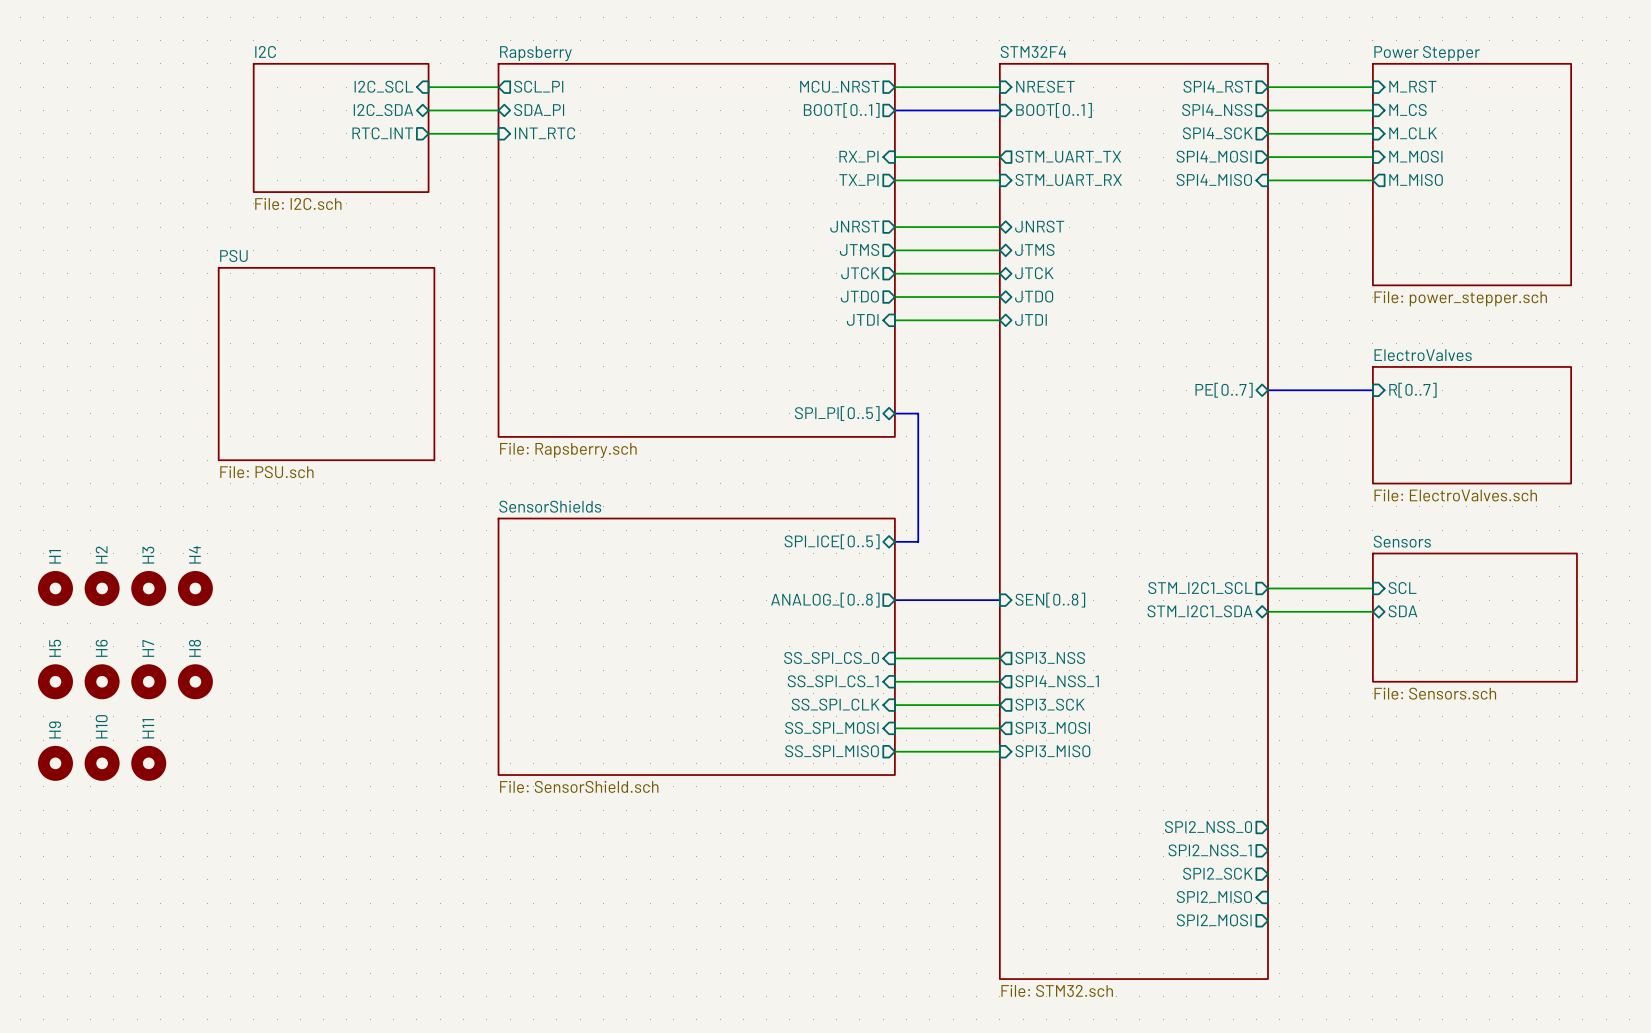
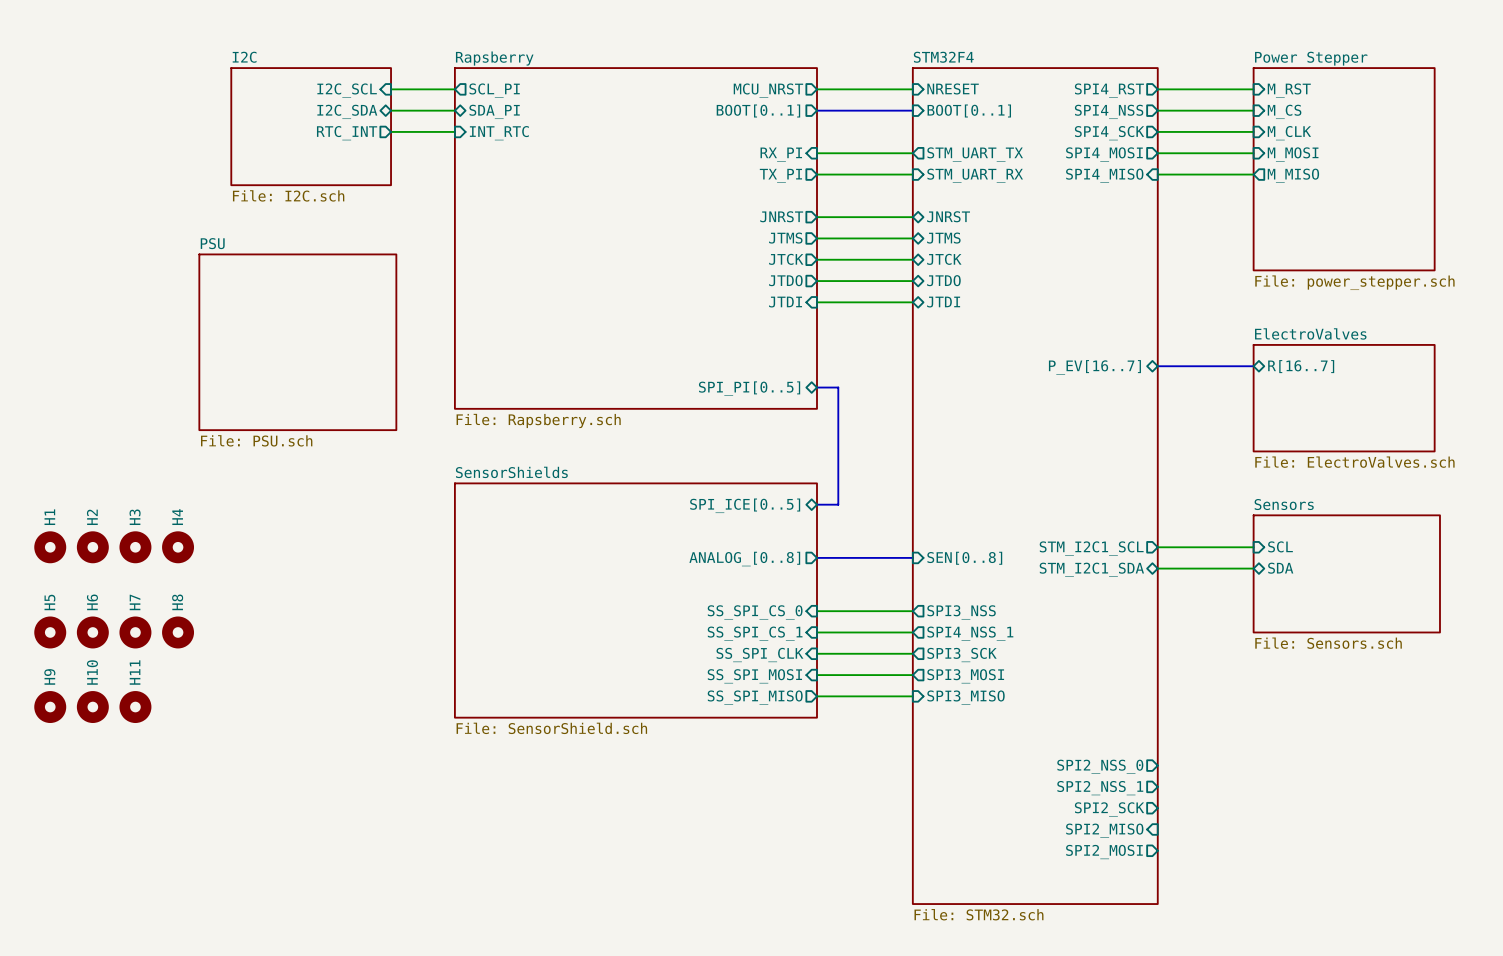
sheet pin: PE[0..7] (1224, 390) -> P_EV[16..7] (1094, 367)
sheet pin shape: input (1412, 390) -> bidirectional (1301, 366)
sheet pin: R[0..7] (1412, 390) -> R[16..7] (1301, 366)

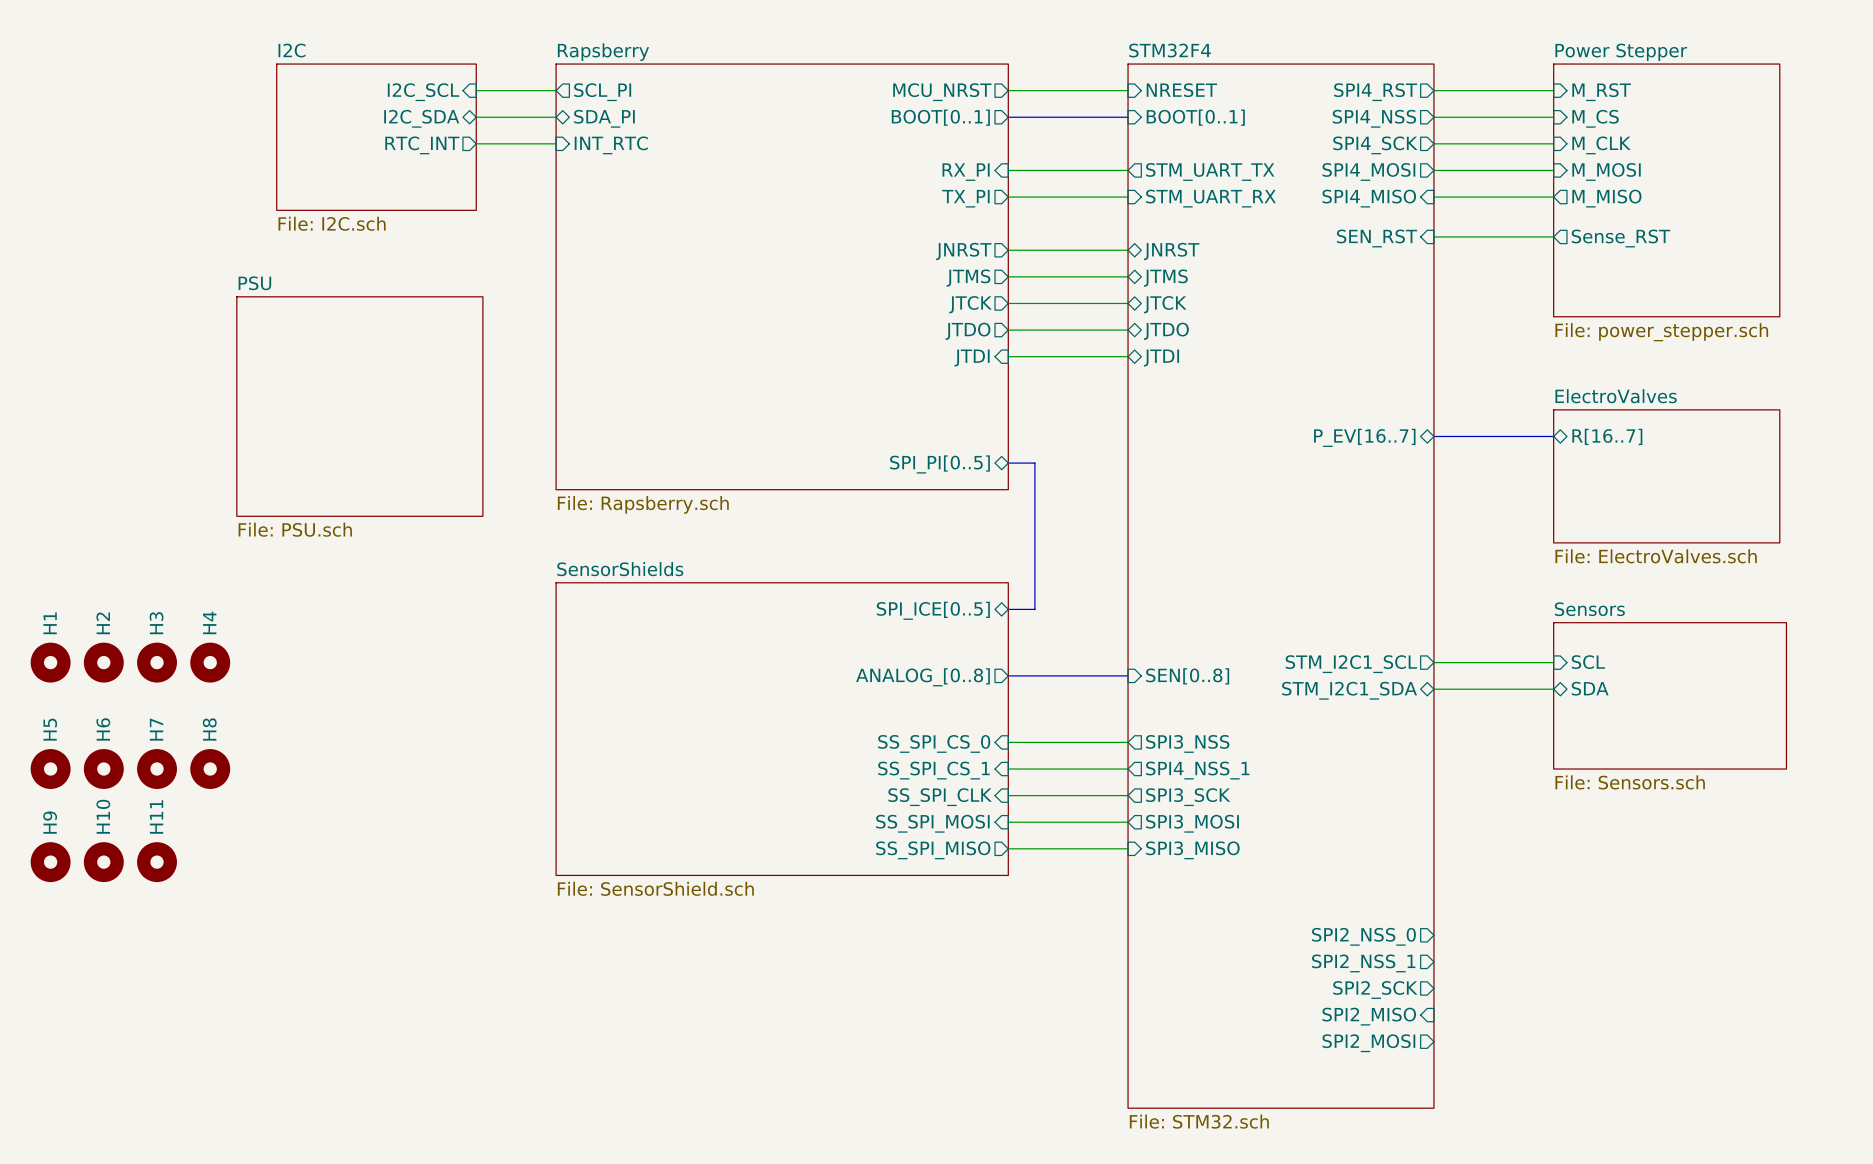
wire: none -> (1433, 236) (1553, 236)
sheet pin: none -> SEN_RST (1377, 238)
sheet pin: none -> Sense_RST (1621, 238)

